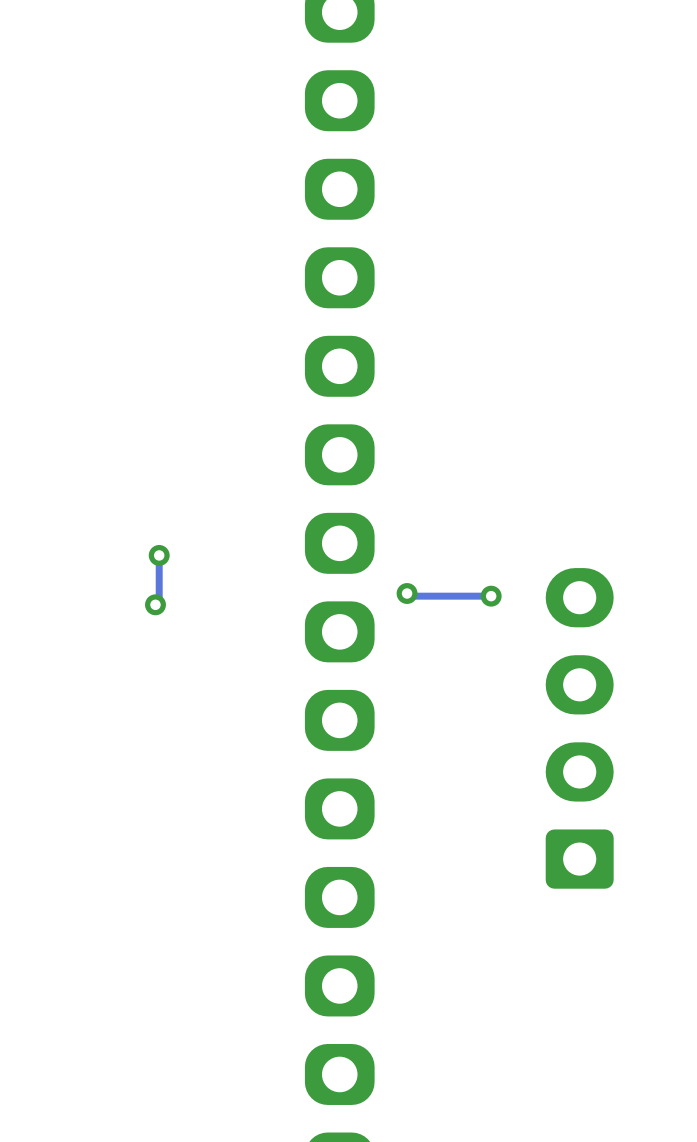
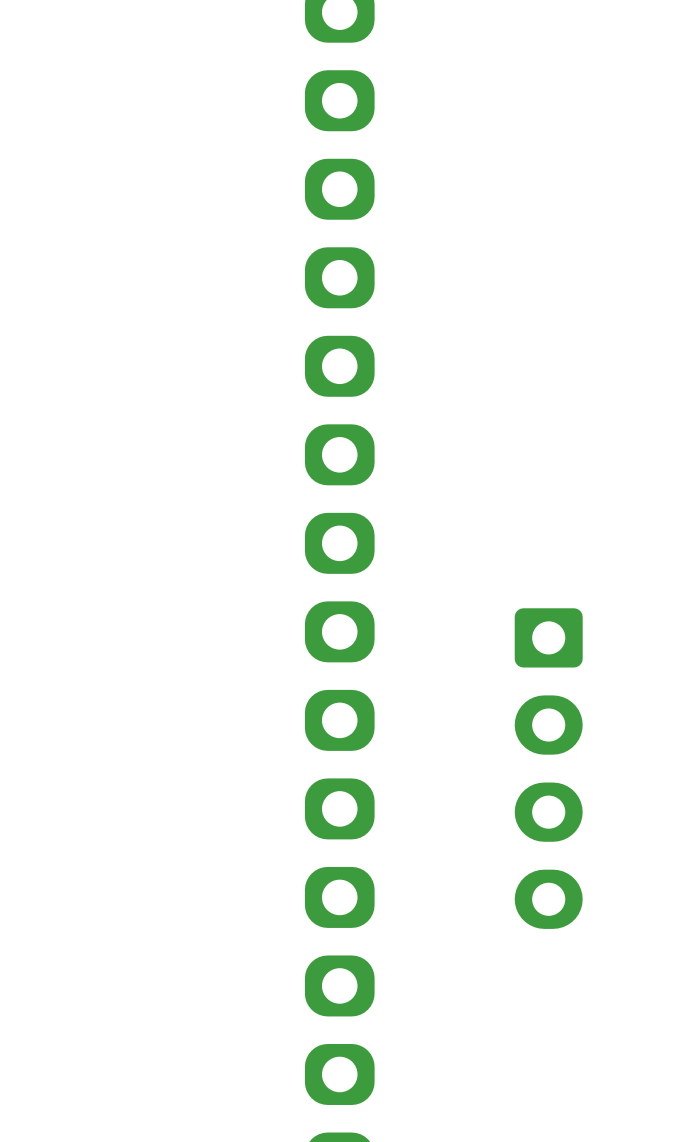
track: (159, 555) (159, 601) (155, 604) -> none
via: (159, 555) -> none
track: (407, 593) (409, 596) (491, 596) -> none
via: (407, 593) -> none
via: (491, 596) -> none
via: (155, 604) -> none
part rotation: 0° (579, 728) -> 180° (548, 768)

